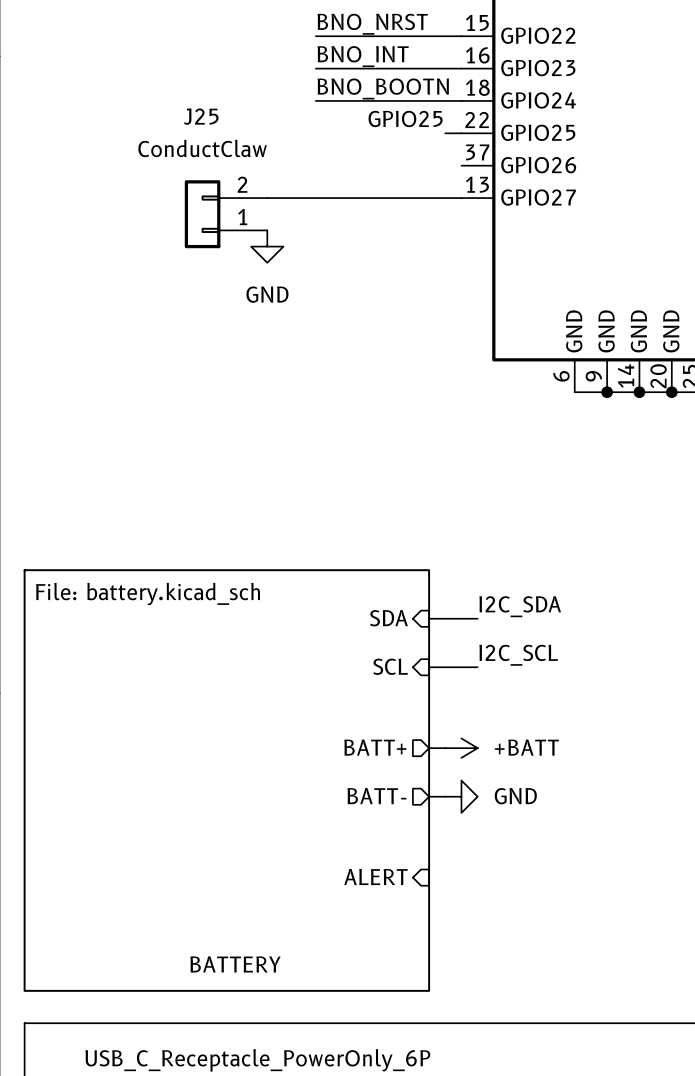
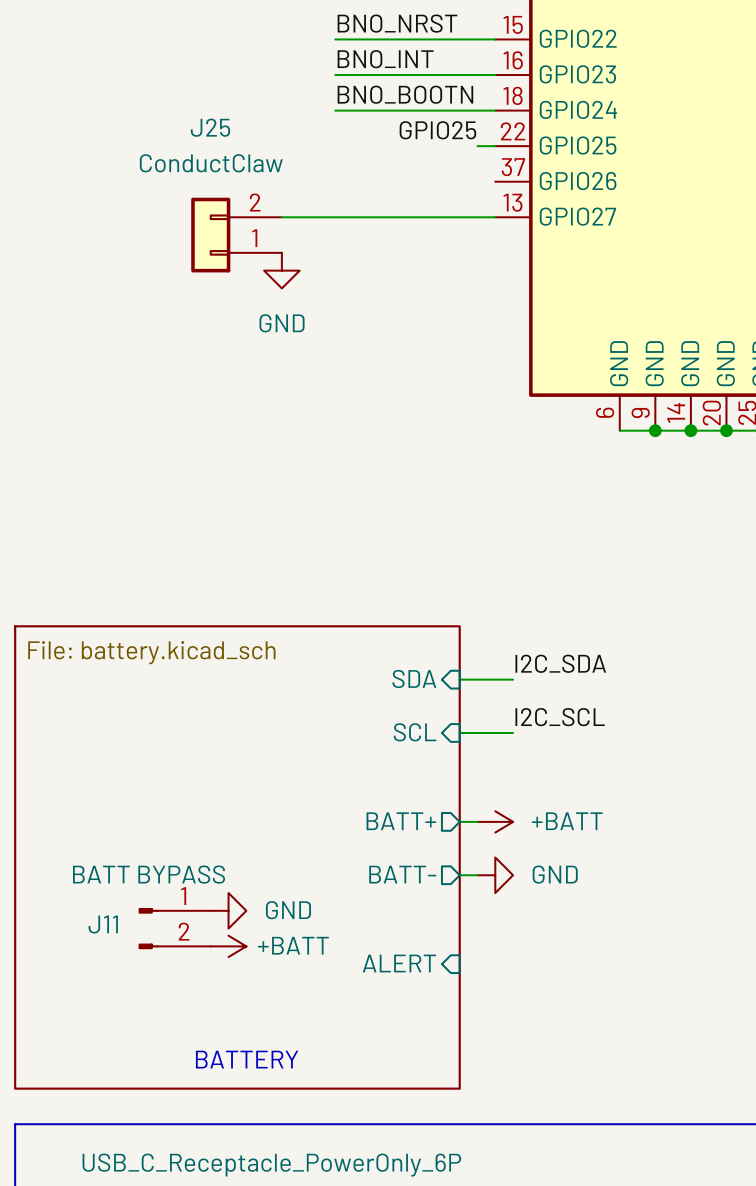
power symbol: none -> GND (228, 910)
J11: none -> BATT BYPASS (174, 928)
power symbol: none -> +BATT (228, 946)

